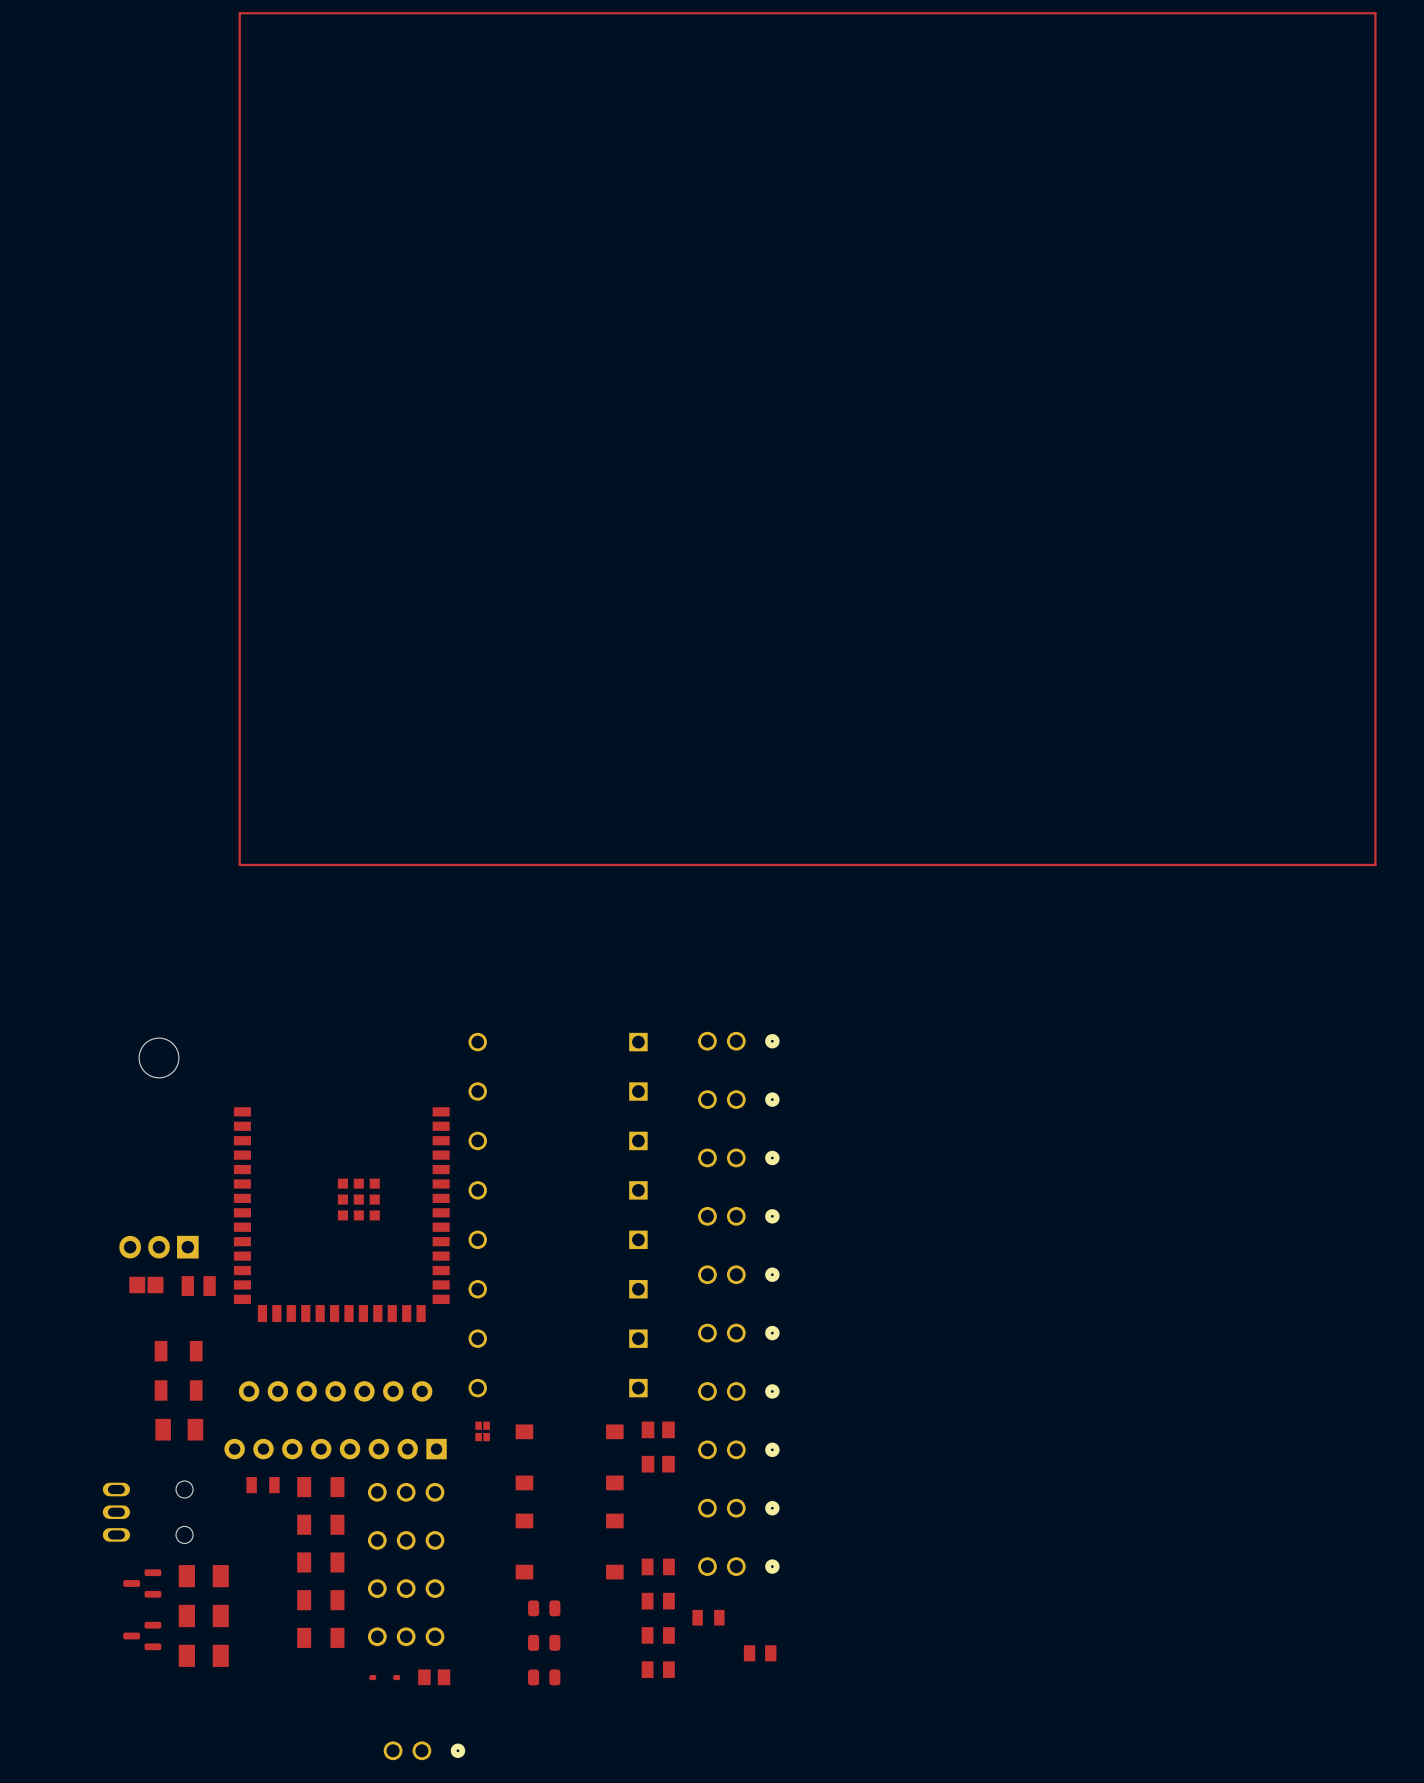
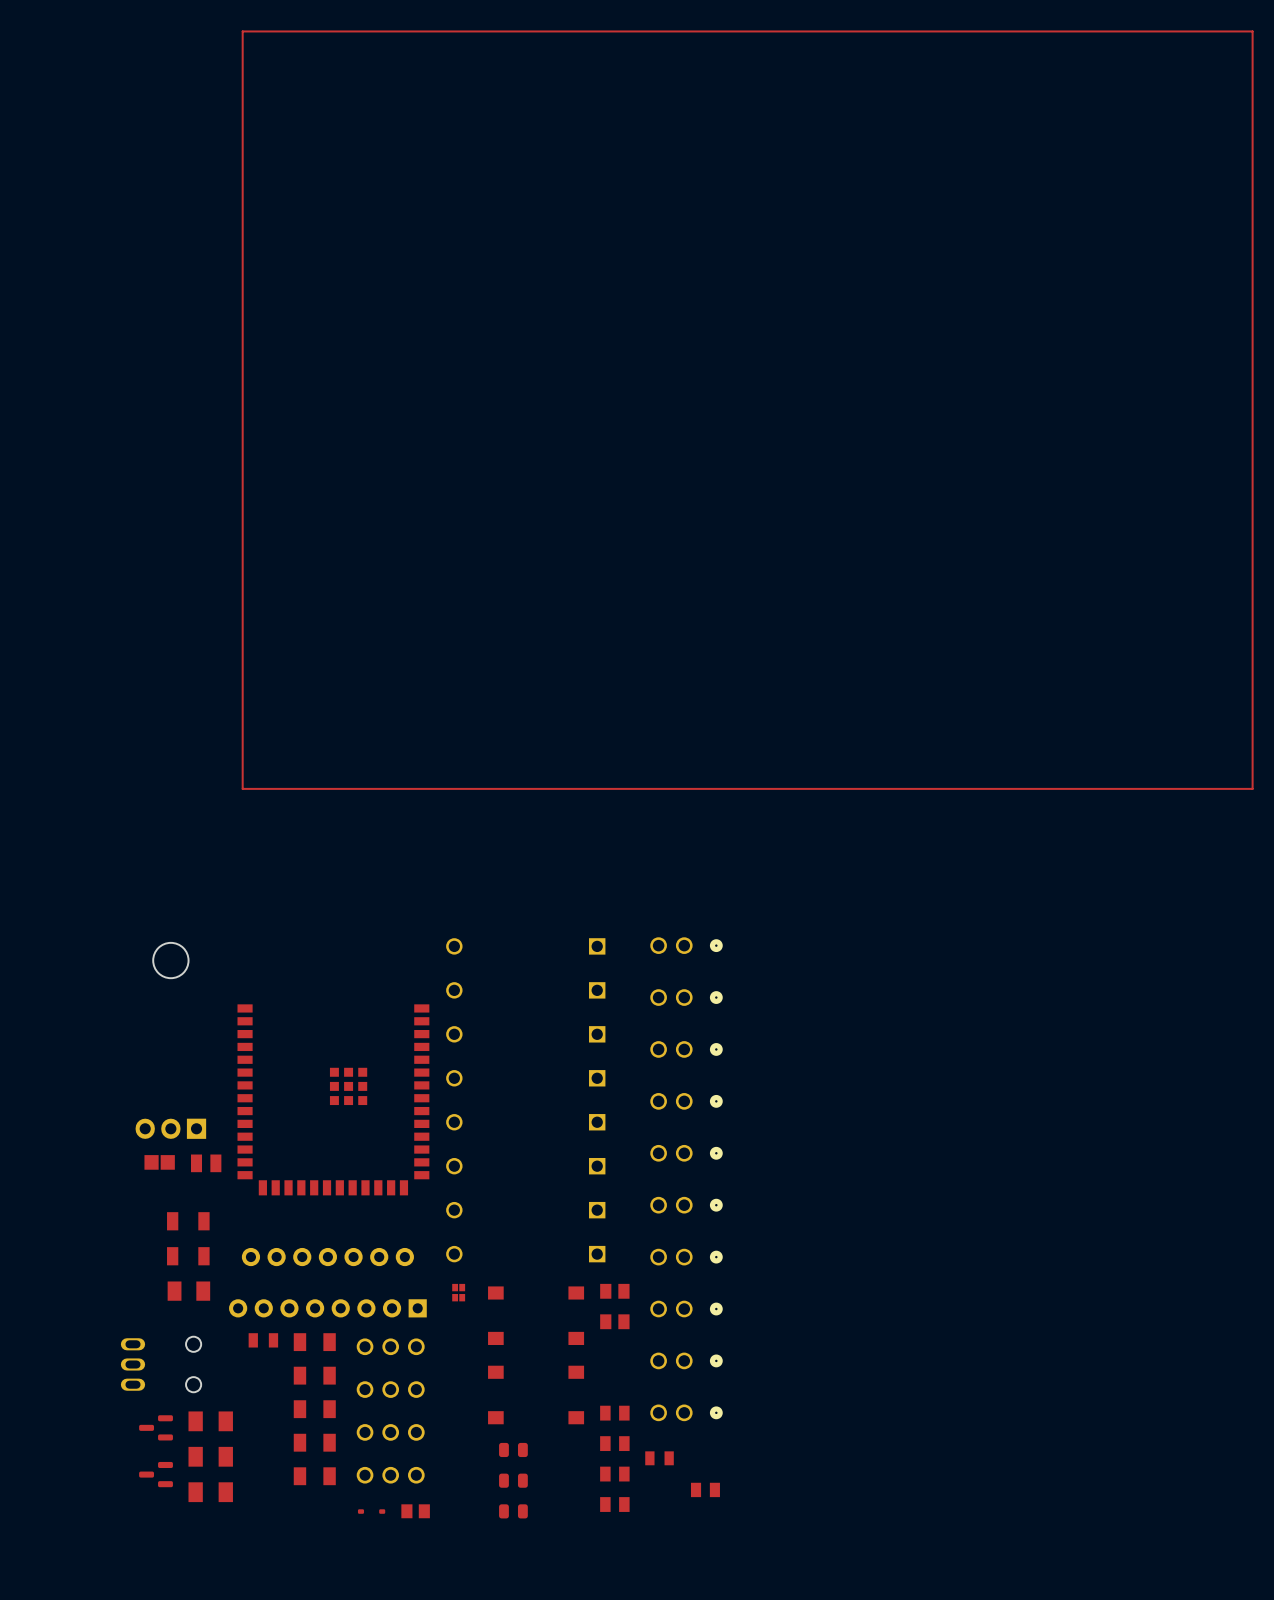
part: (424, 1750) -> none

